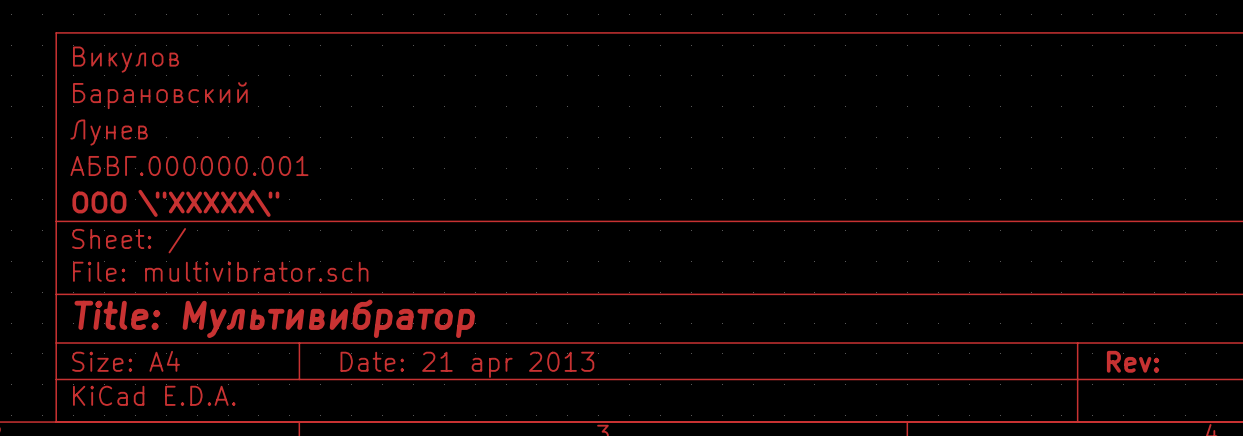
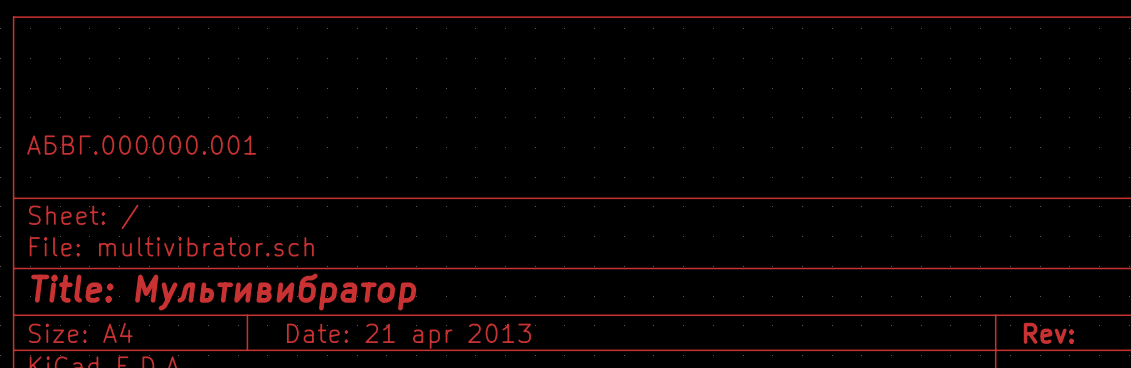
title block: Викулов (126, 59) -> none
title block: Барановский (160, 95) -> none
title block: Лунев (109, 132) -> none
title block: ООО \"XXXXX\" (175, 203) -> none

